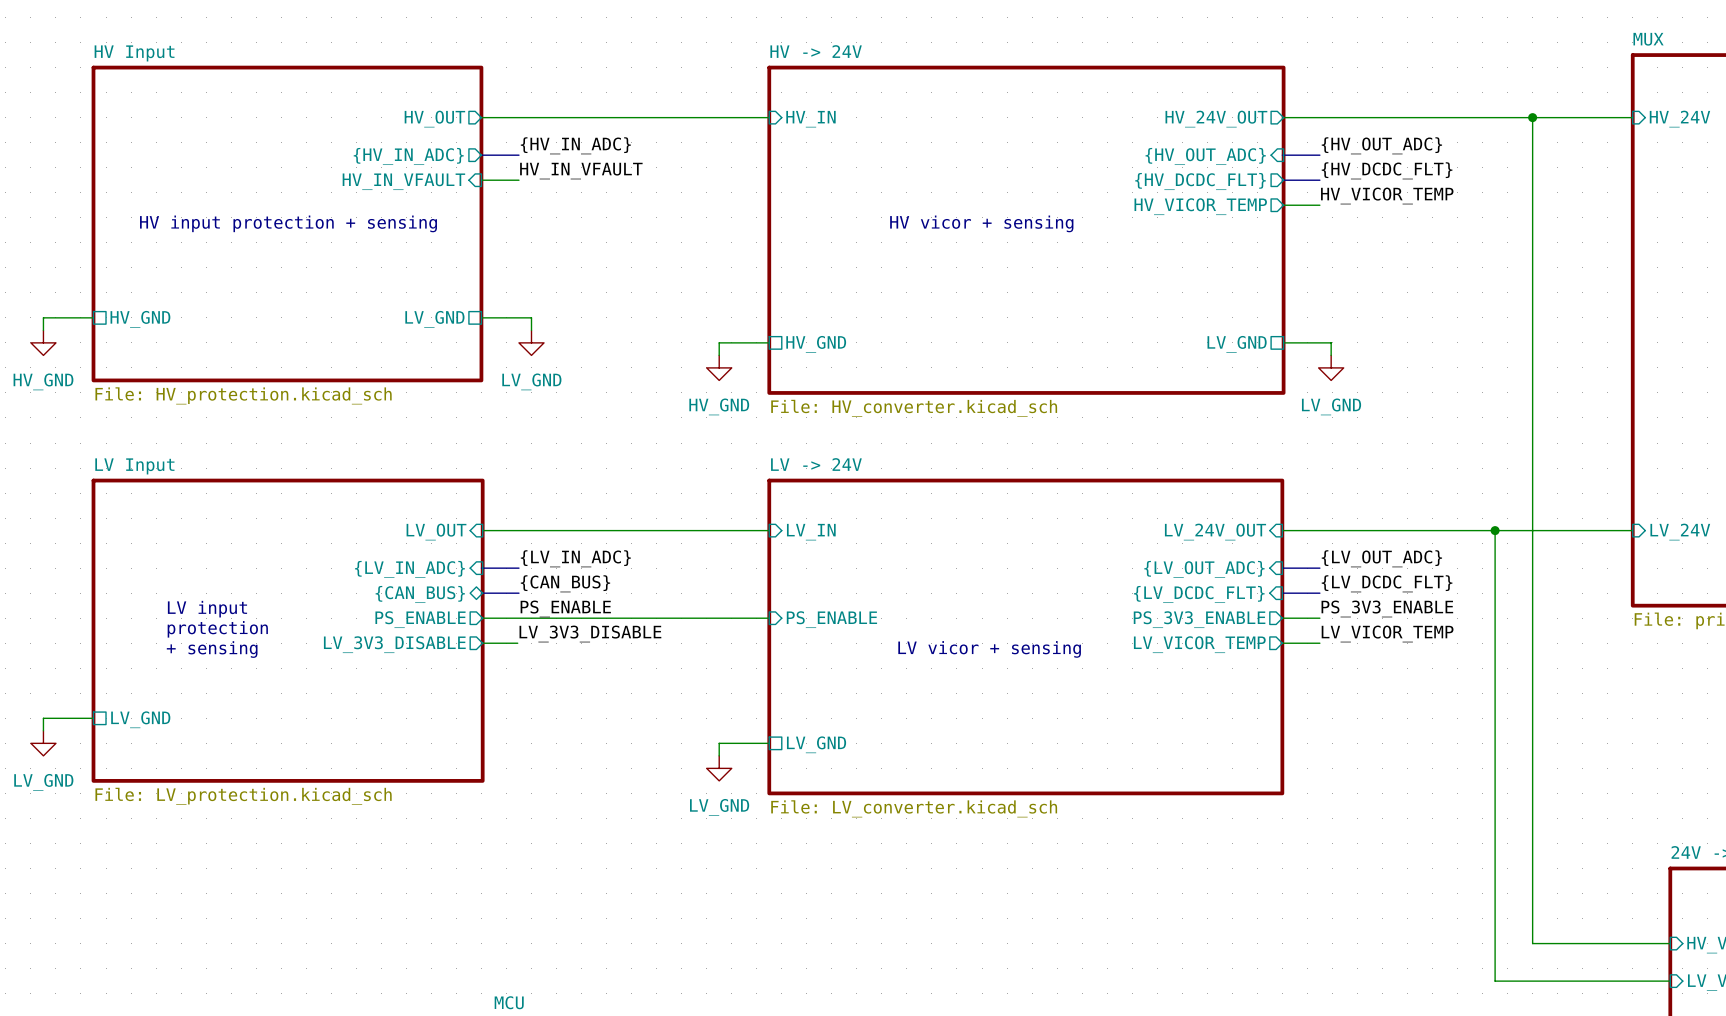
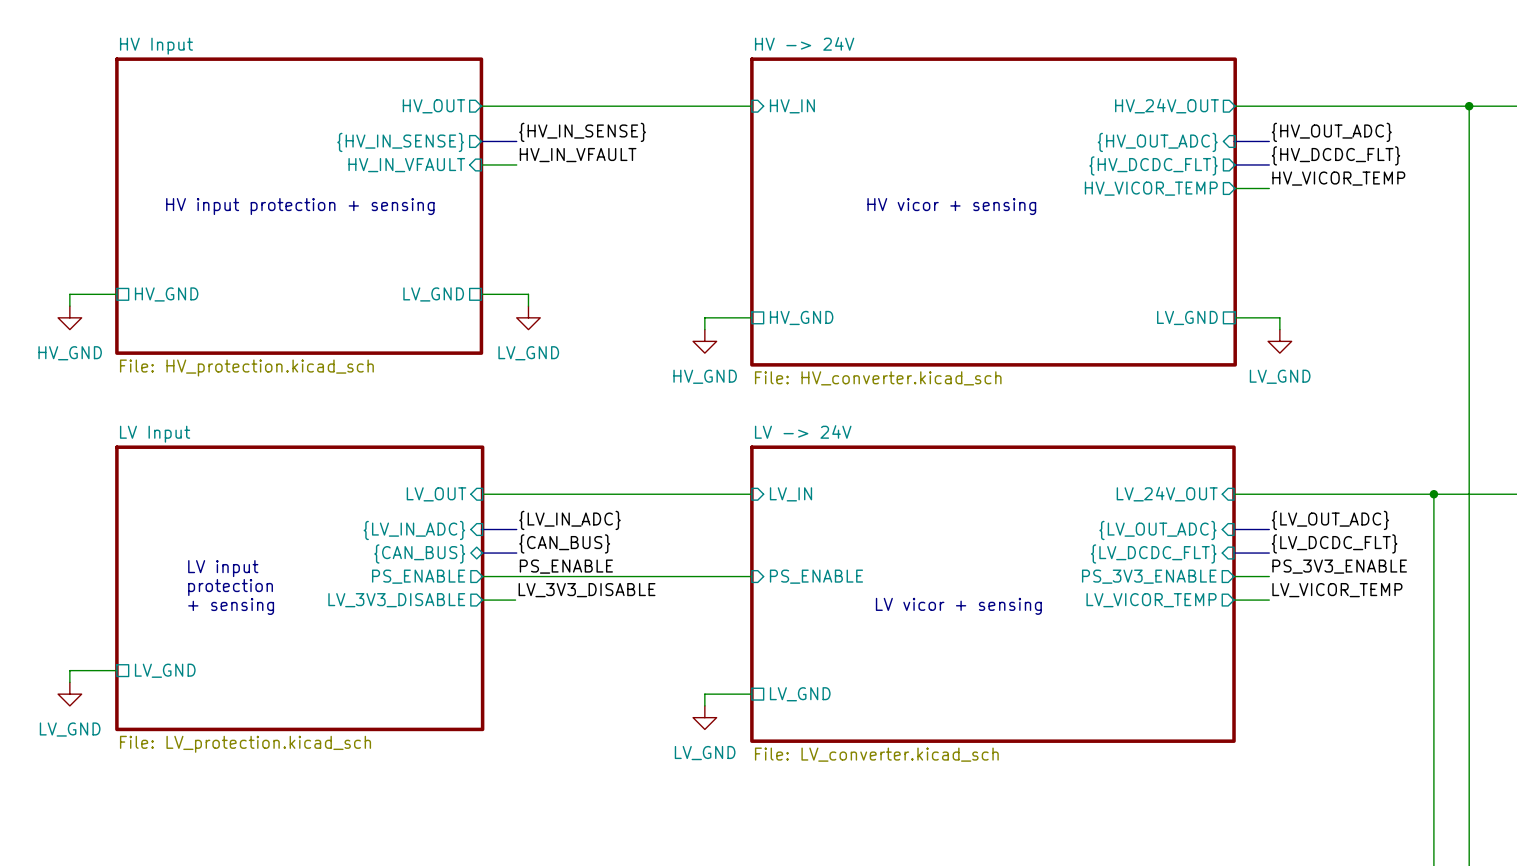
label: {HV_IN_ADC} (575, 145) -> {HV_IN_SENSE} (582, 132)
sheet pin: {HV_IN_ADC} (408, 156) -> {HV_IN_SENSE} (400, 142)

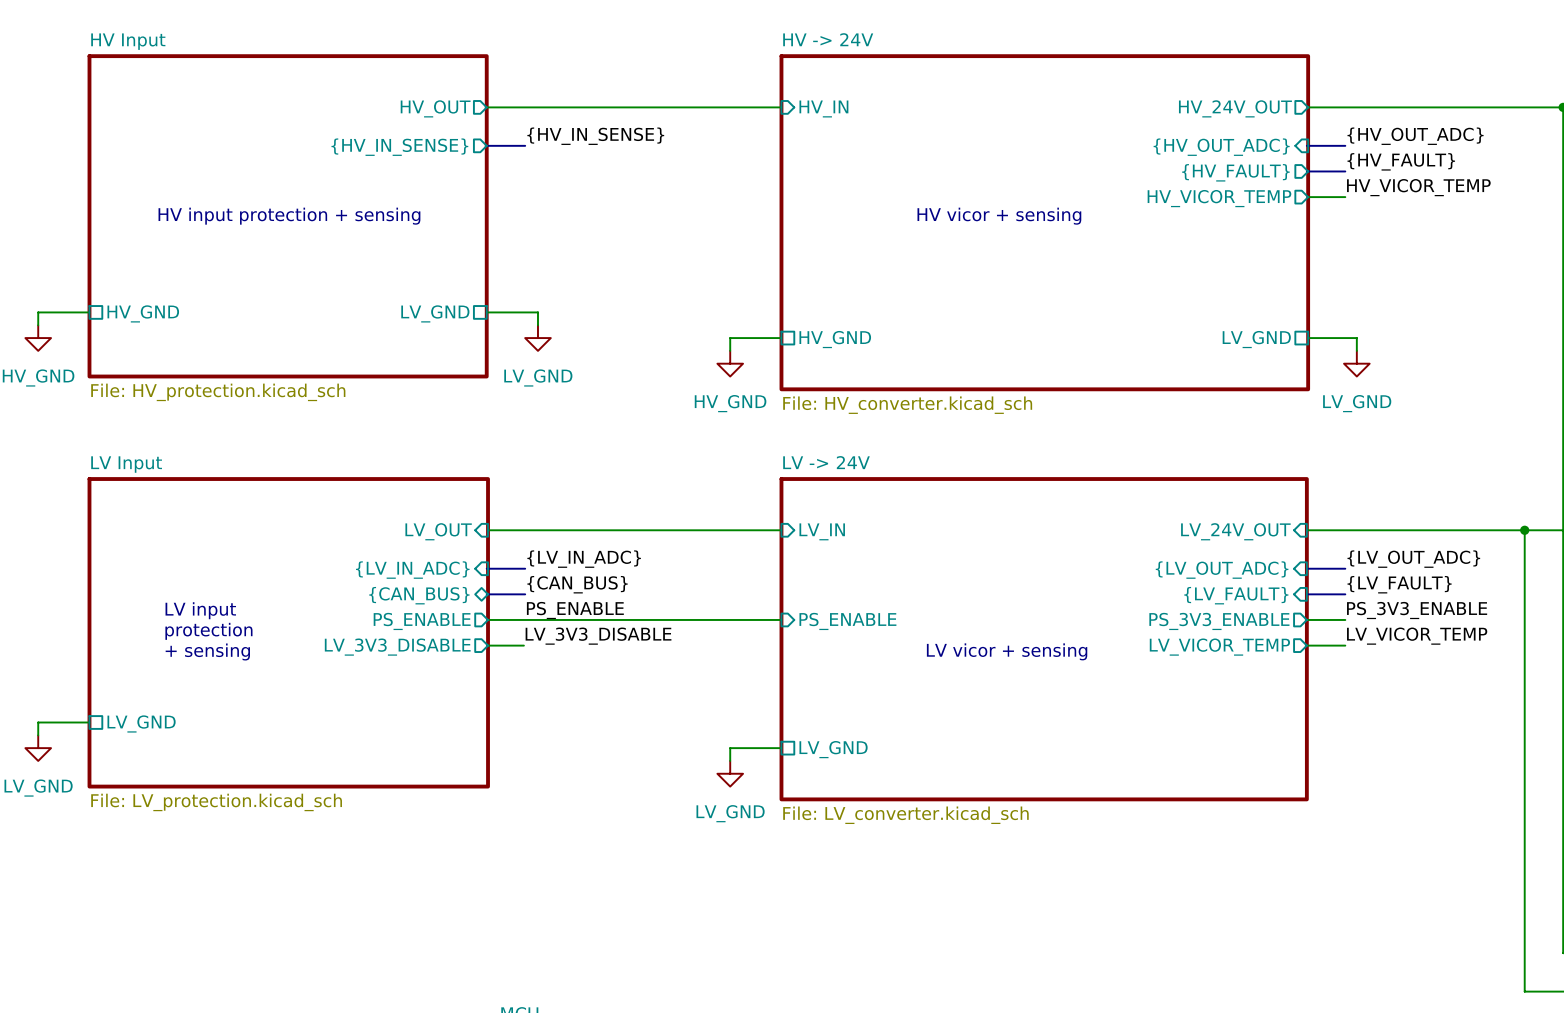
label: HV_IN_VFAULT (578, 155) -> none
label: {HV_DCDC_FLT} (1336, 155) -> {HV_FAULT} (1401, 161)
wire: (481, 164) (516, 164) -> none
sheet pin: HV_IN_VFAULT (406, 165) -> none
sheet pin: {HV_DCDC_FLT} (1153, 165) -> {HV_FAULT} (1235, 172)
label: {LV_DCDC_FLT} (1334, 543) -> {LV_FAULT} (1399, 584)
sheet pin: {LV_DCDC_FLT} (1153, 553) -> {LV_FAULT} (1236, 595)

